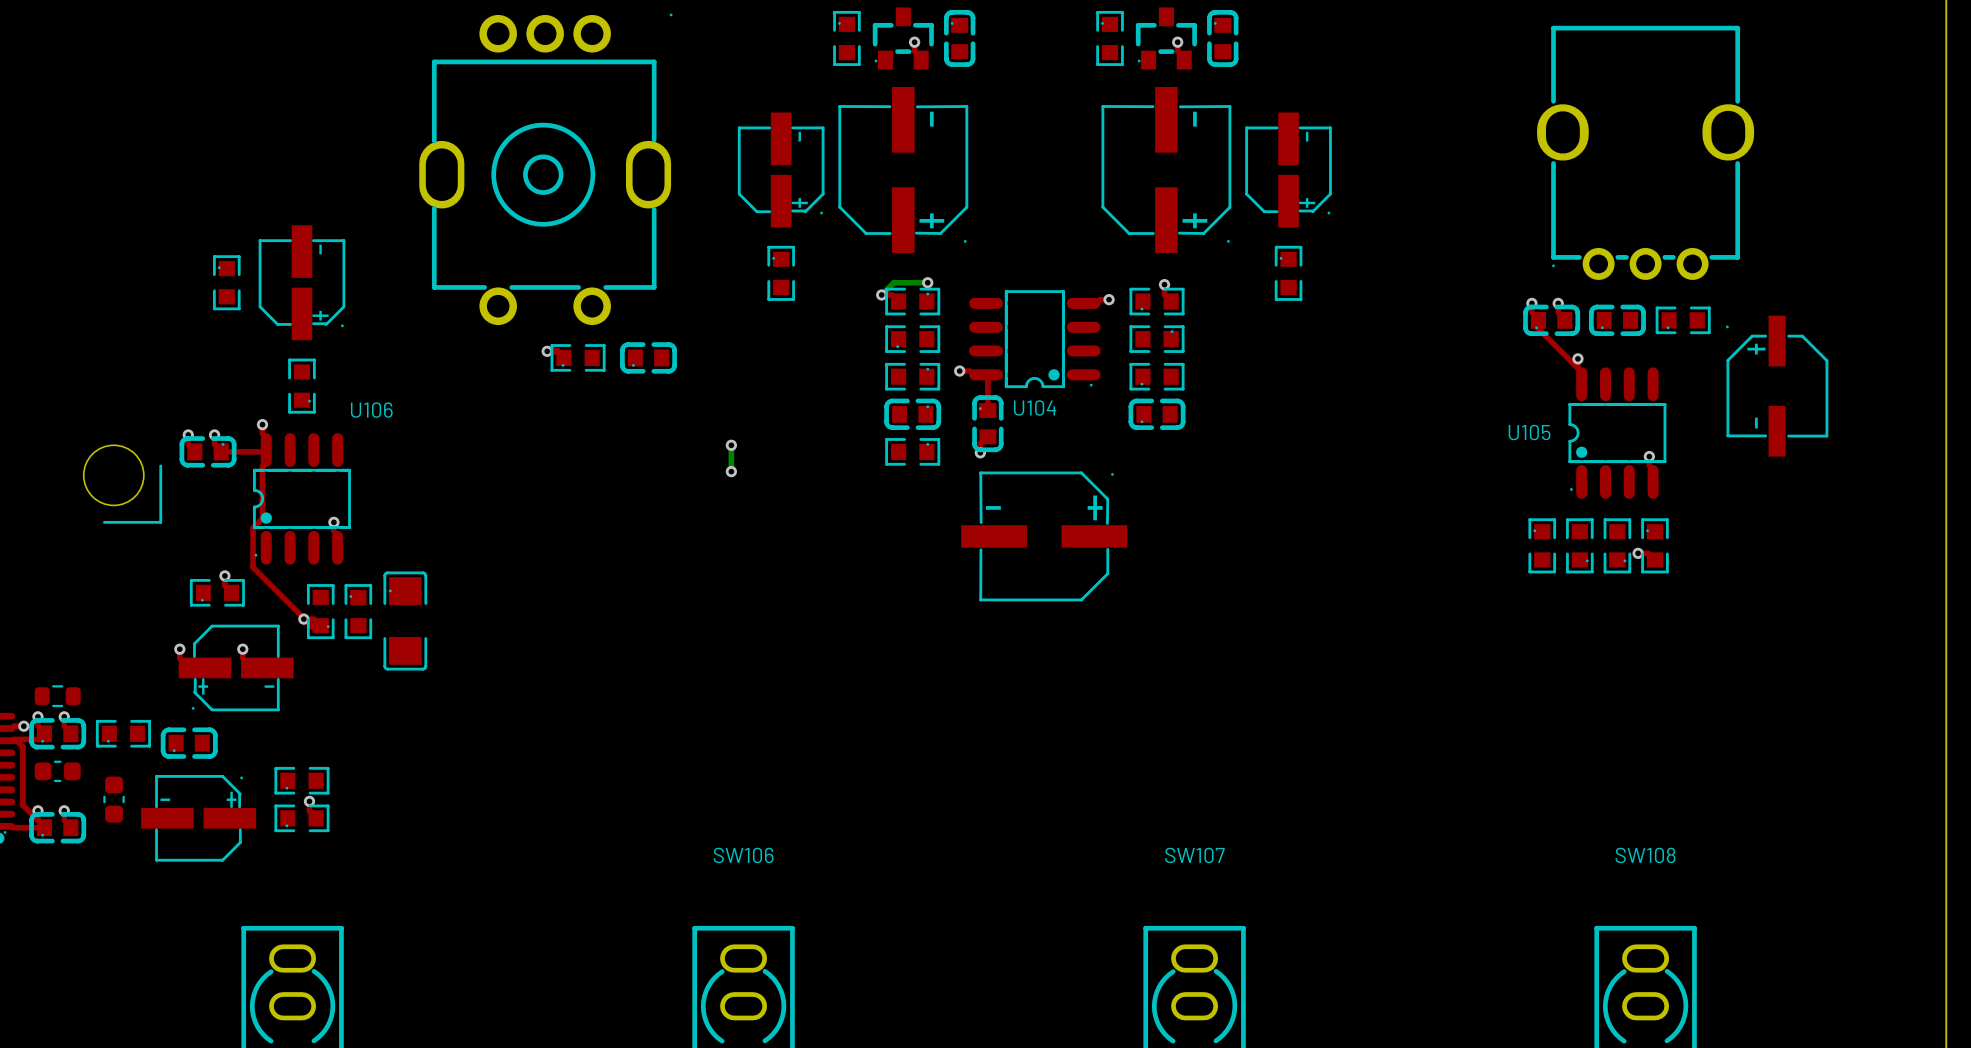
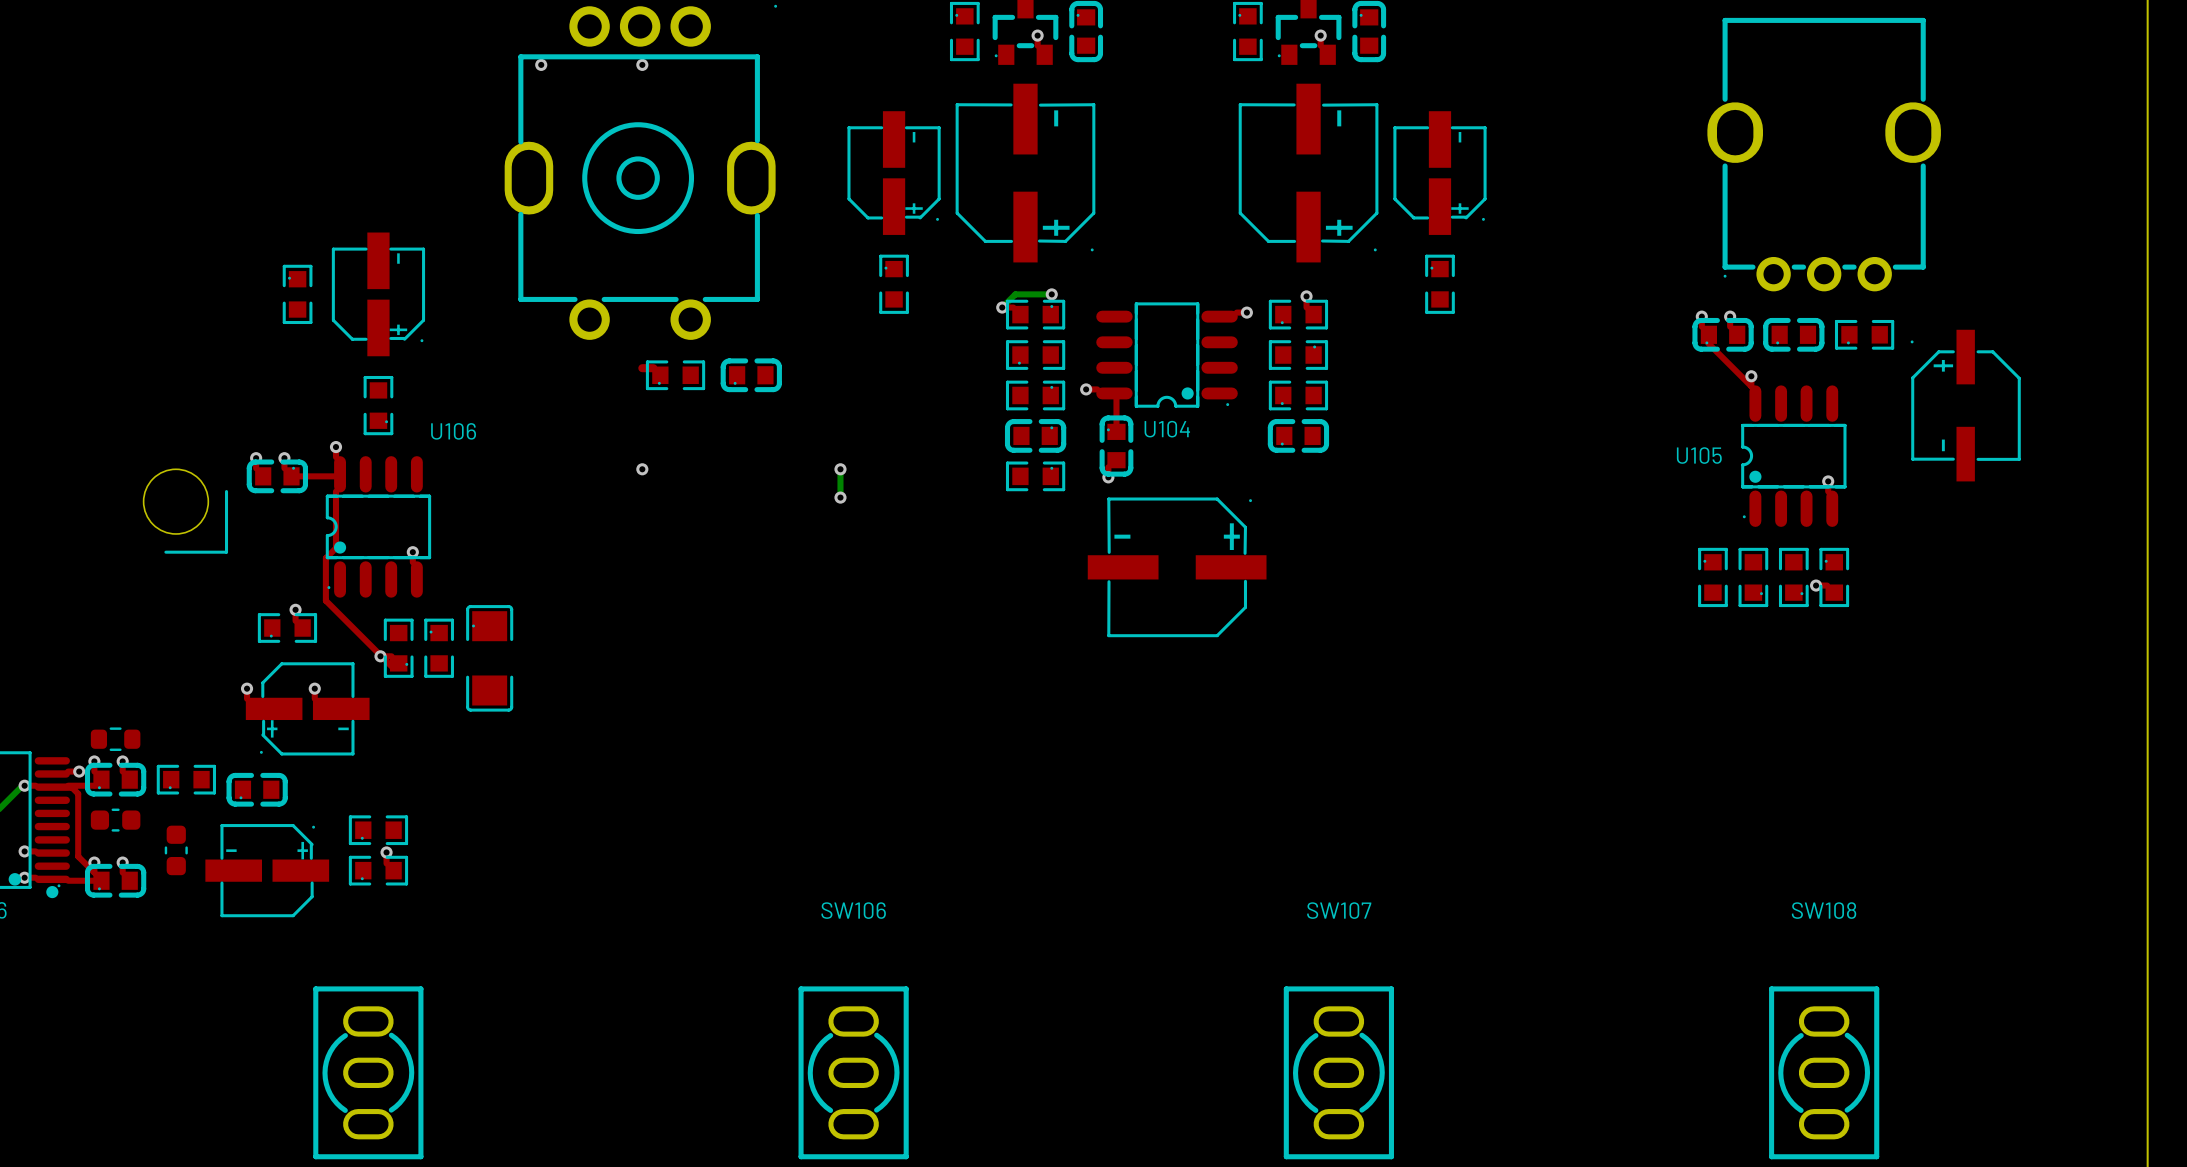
via: none -> (541, 64)
via: none -> (642, 64)
via position: (547, 351) -> (642, 469)

